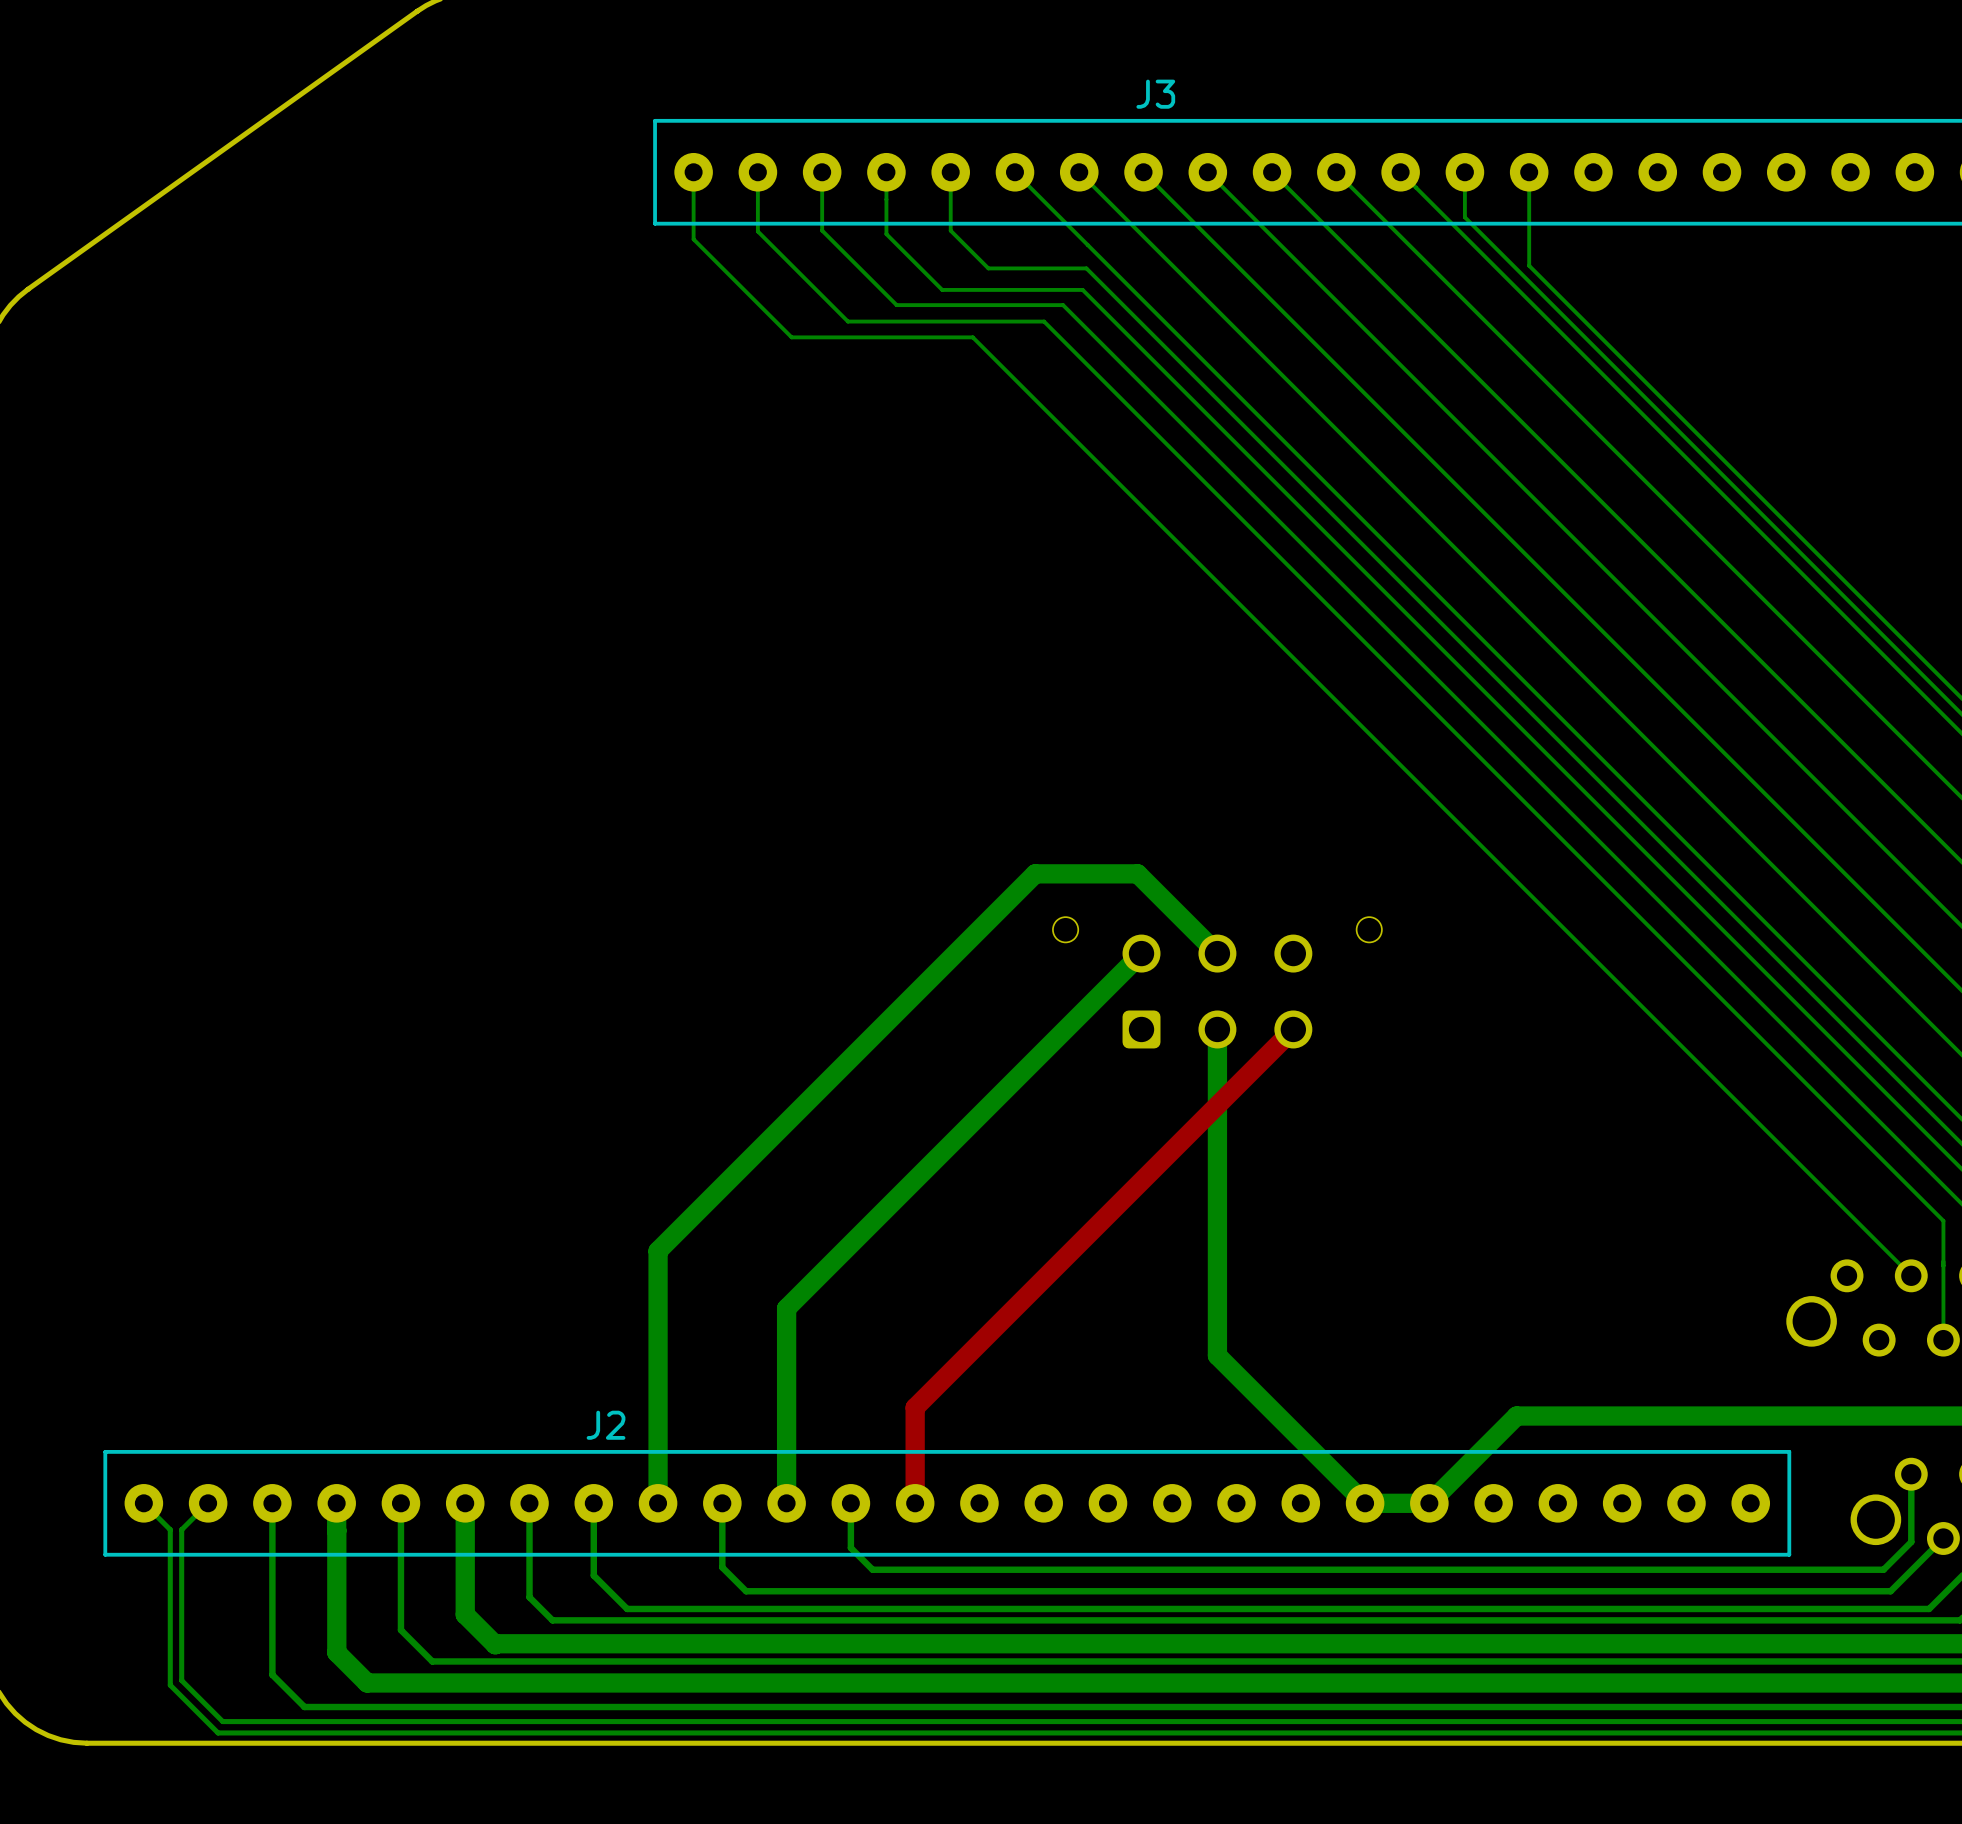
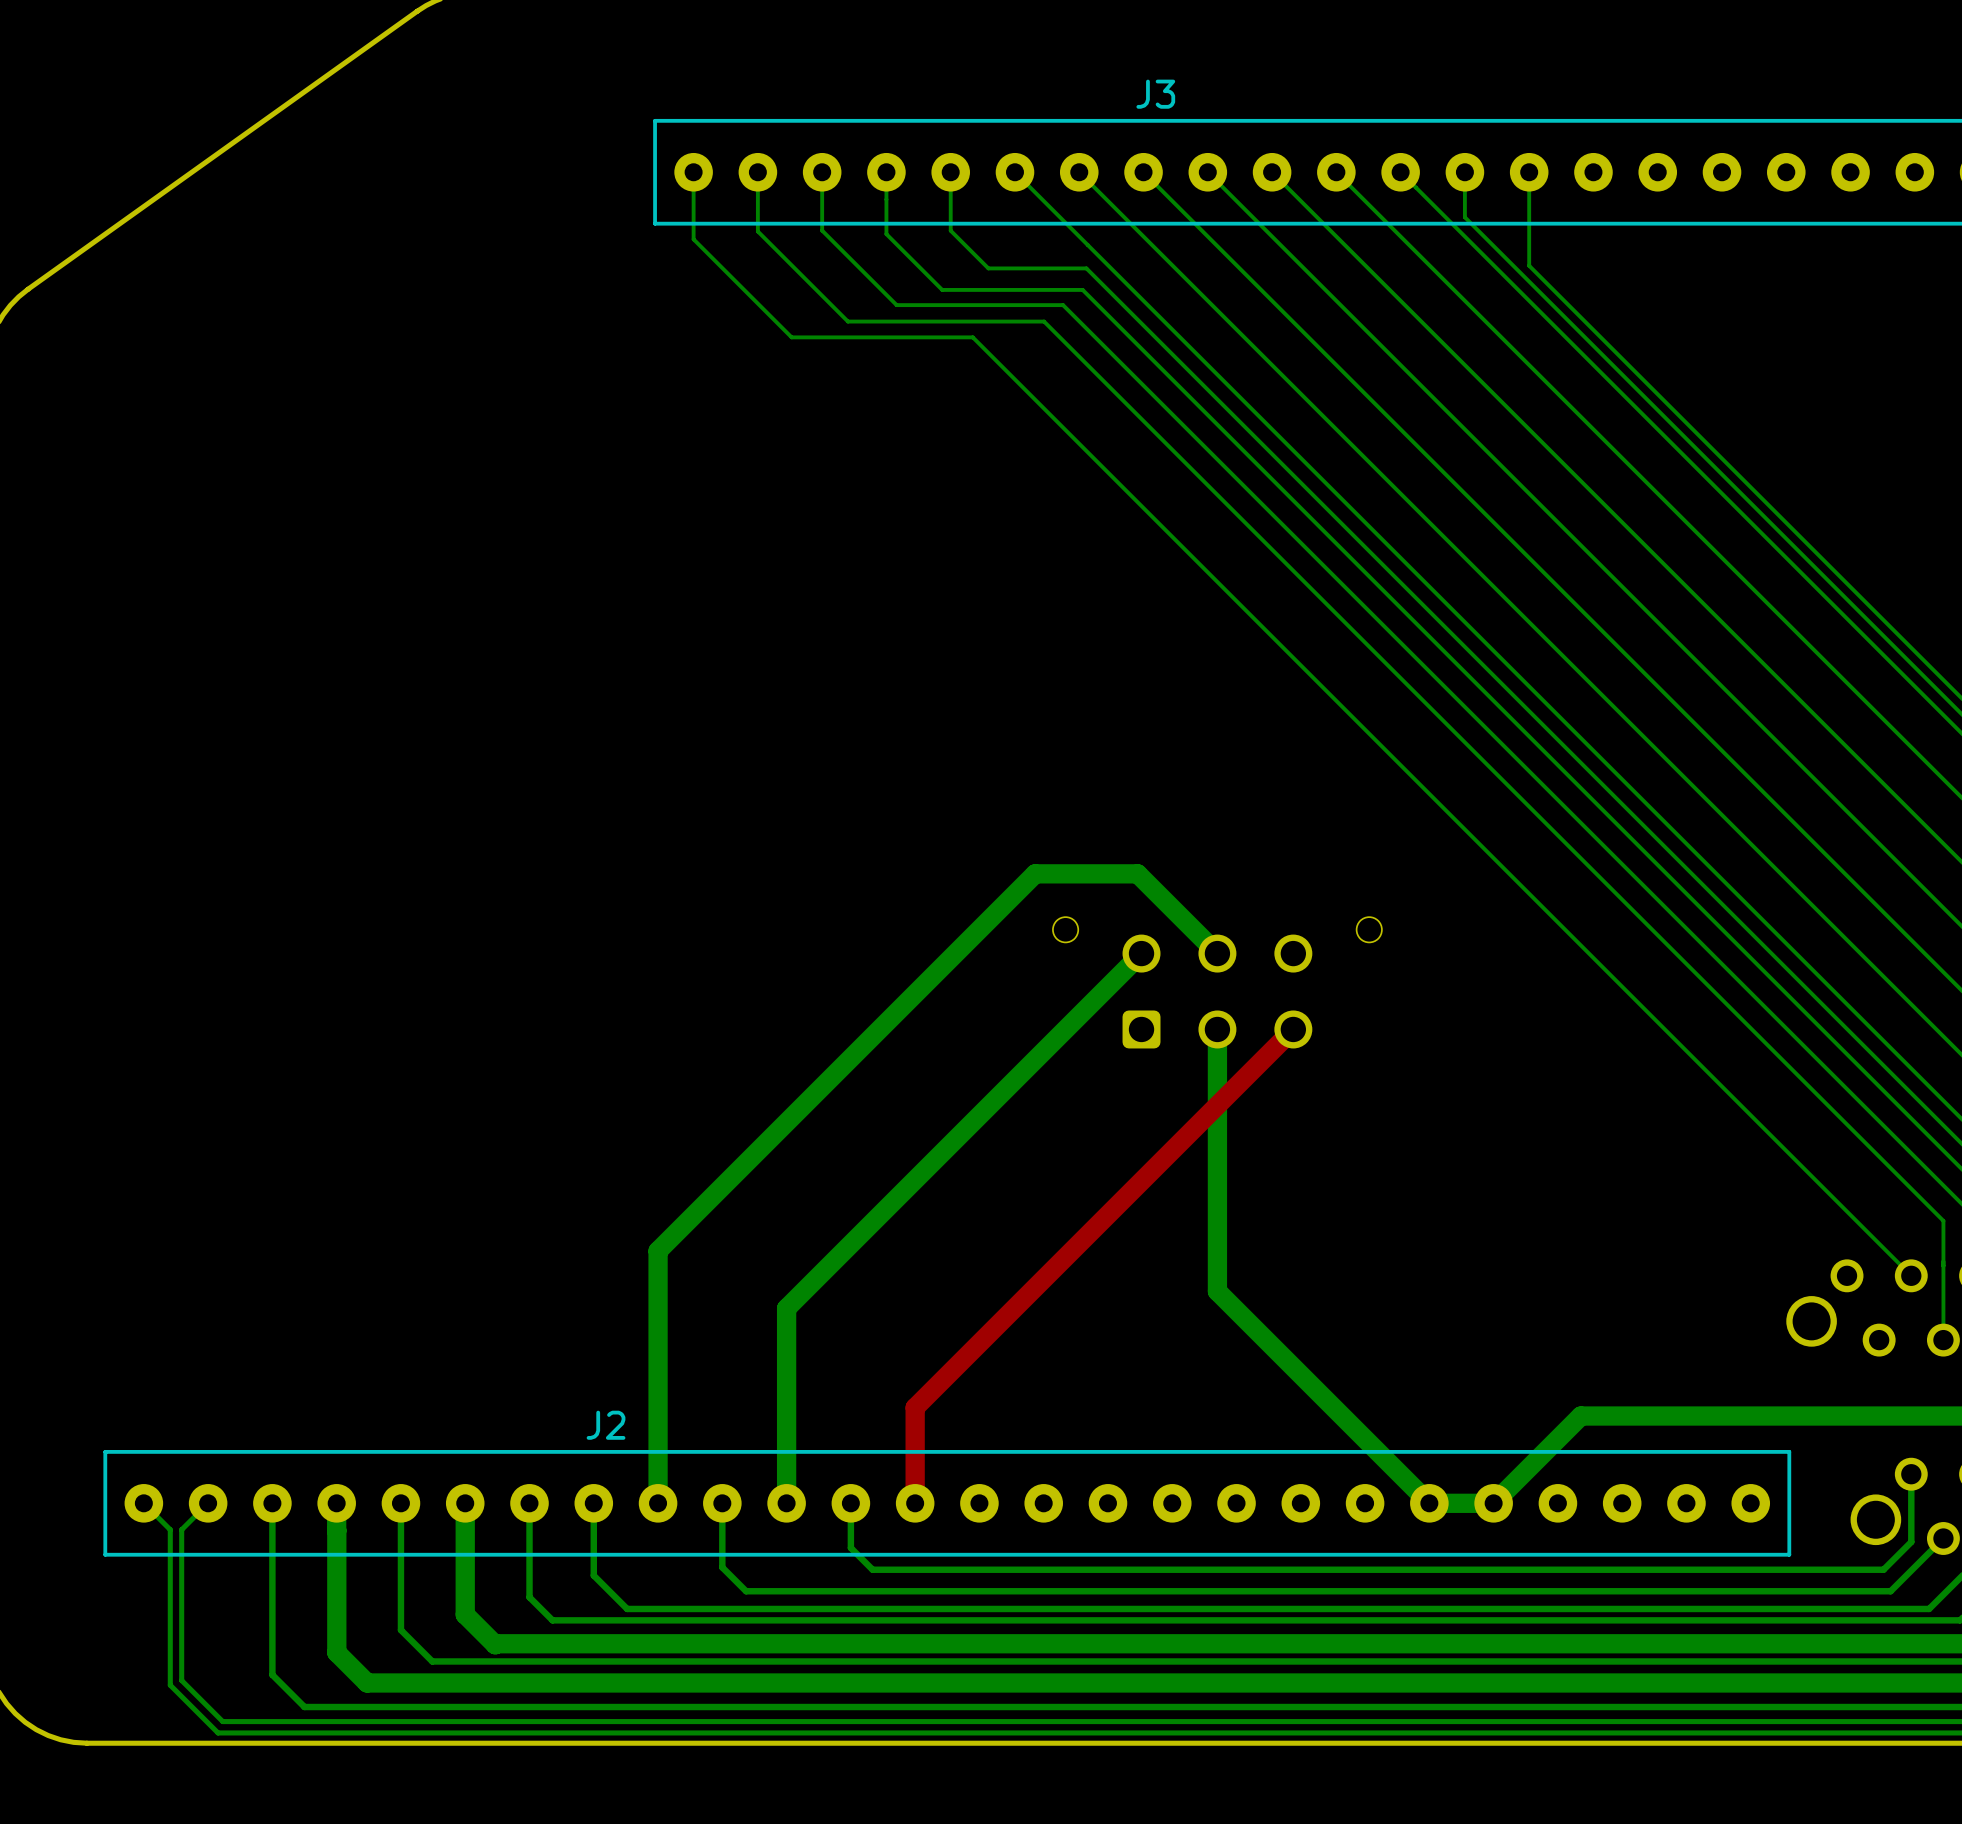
bottom track: (1217, 1291) (1217, 1355) (1365, 1503) (1429, 1503) (1516, 1416) (1580, 1416) -> (1217, 1291) (1429, 1503) (1493, 1503) (1580, 1416)

